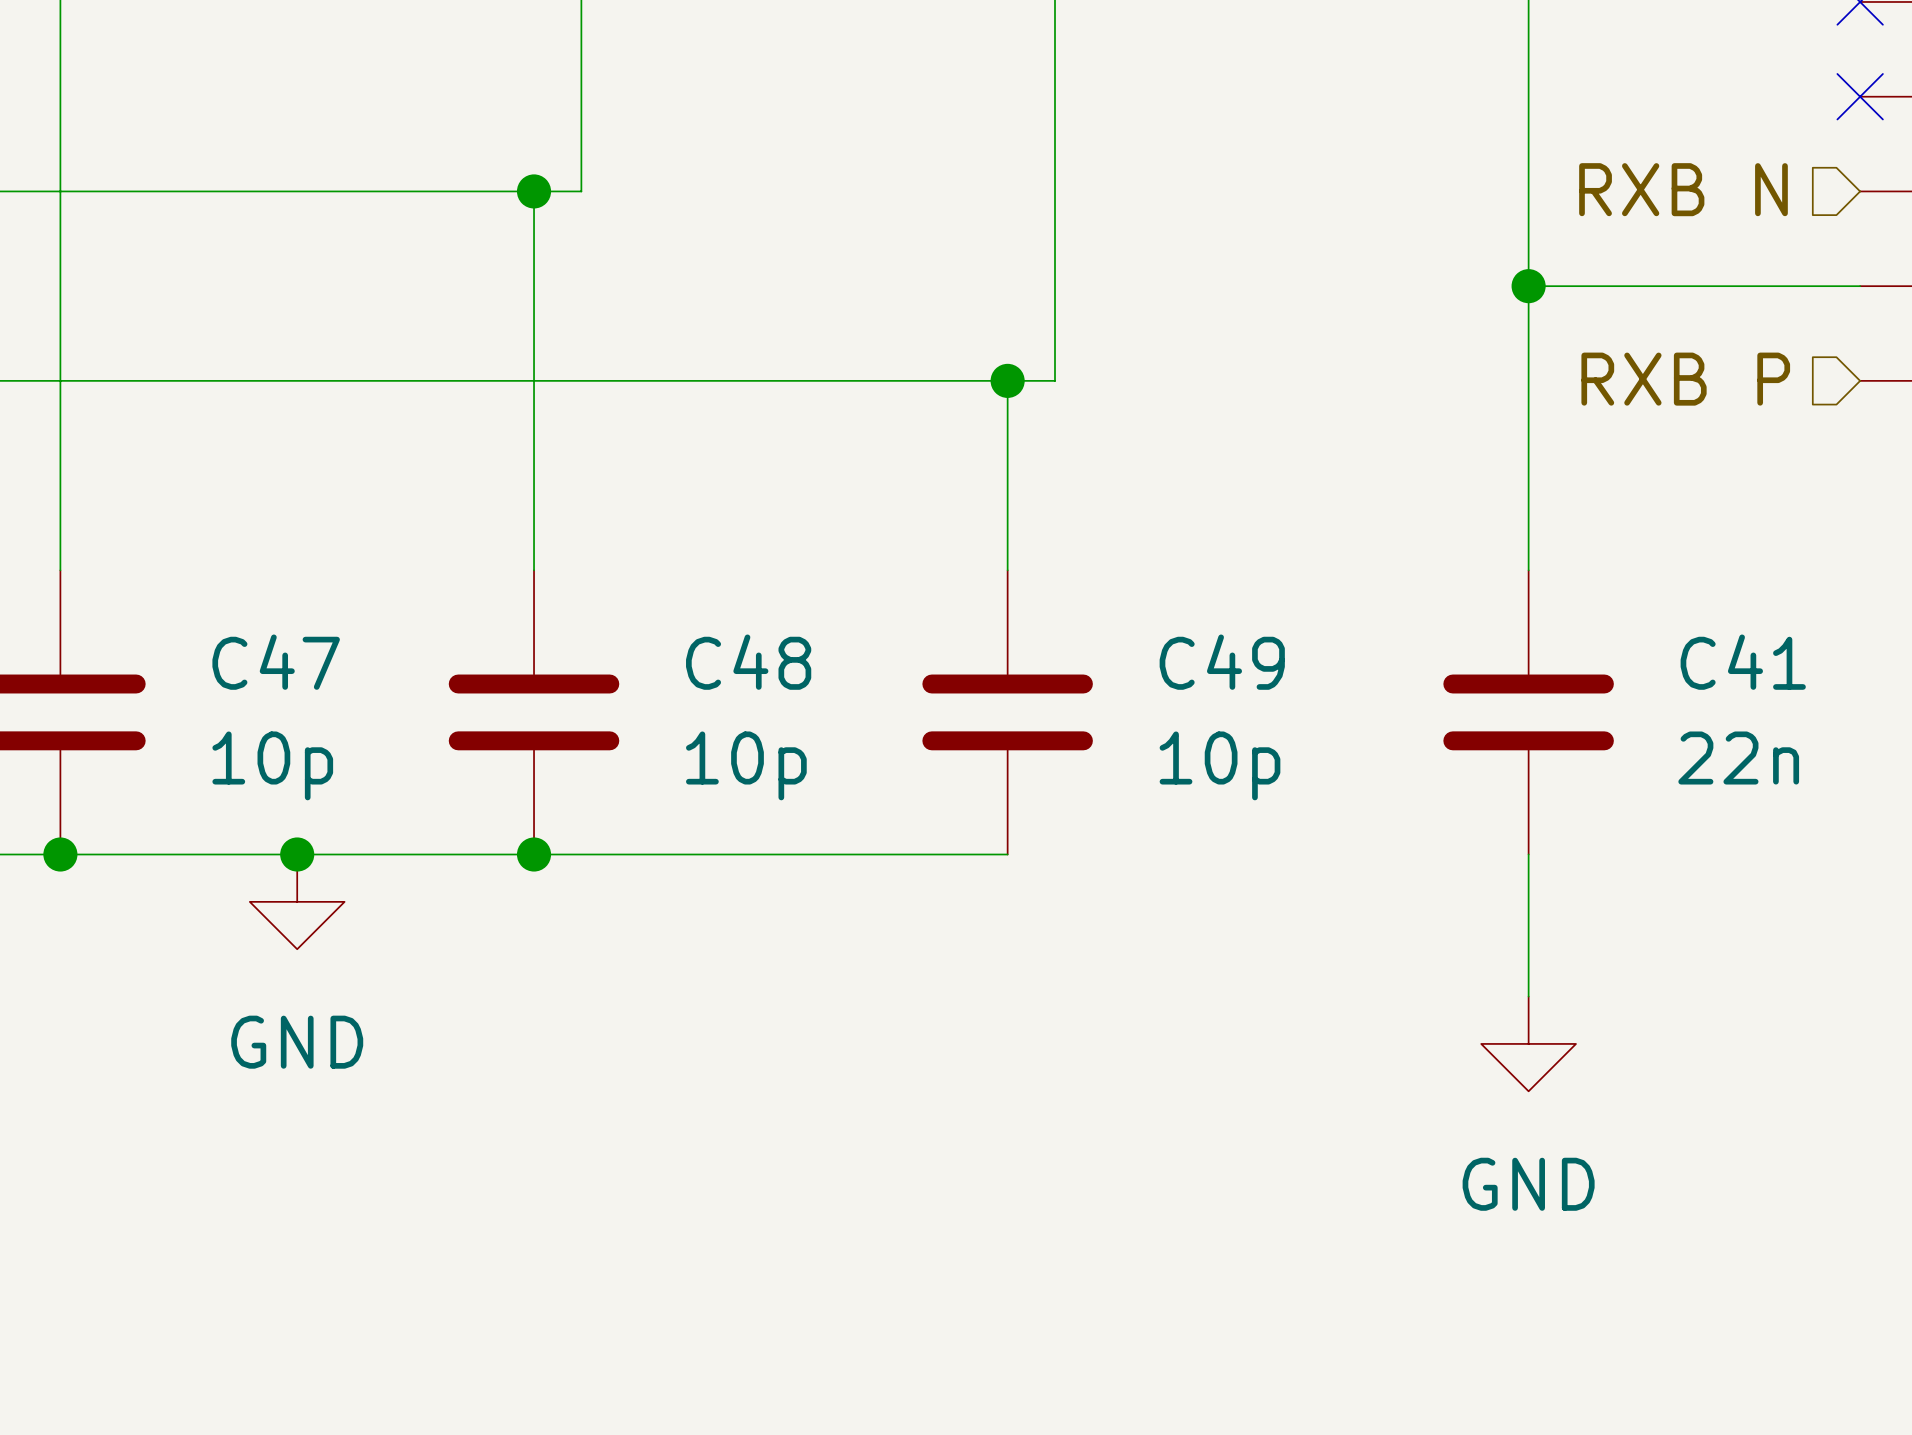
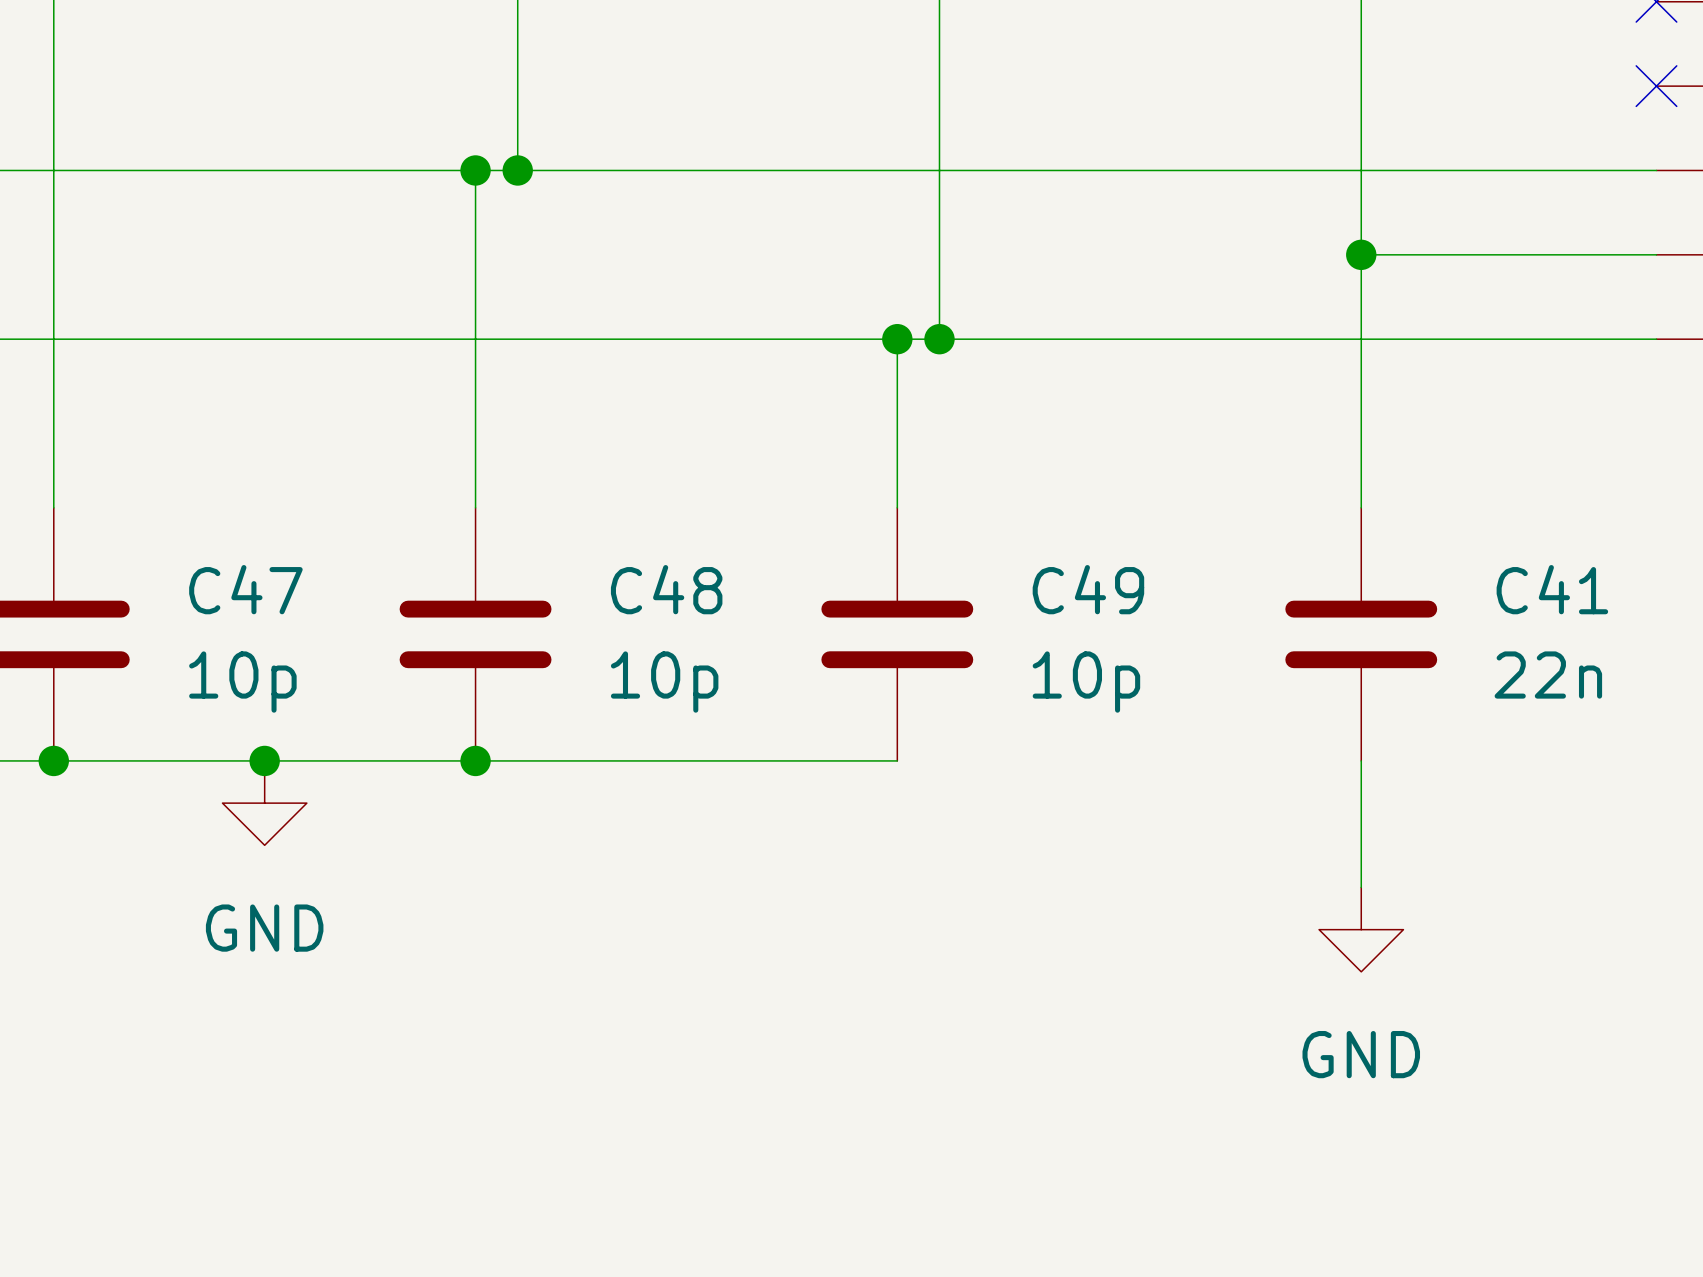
hierarchical label: RXB N (1683, 189) -> none
wire: none -> (517, 170) (1656, 170)
junction: none -> (517, 170)
hierarchical label: RXB P (1685, 379) -> none
wire: none -> (939, 339) (1656, 339)
junction: none -> (939, 339)

